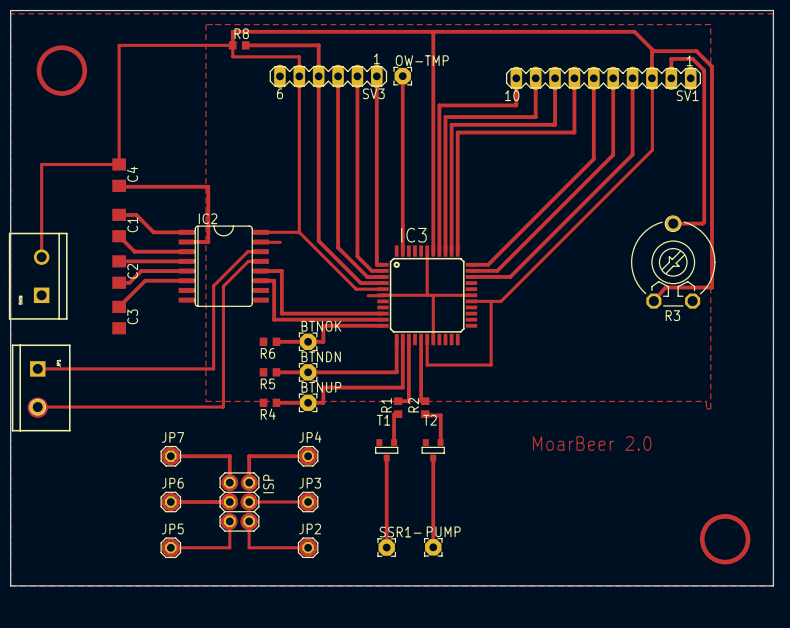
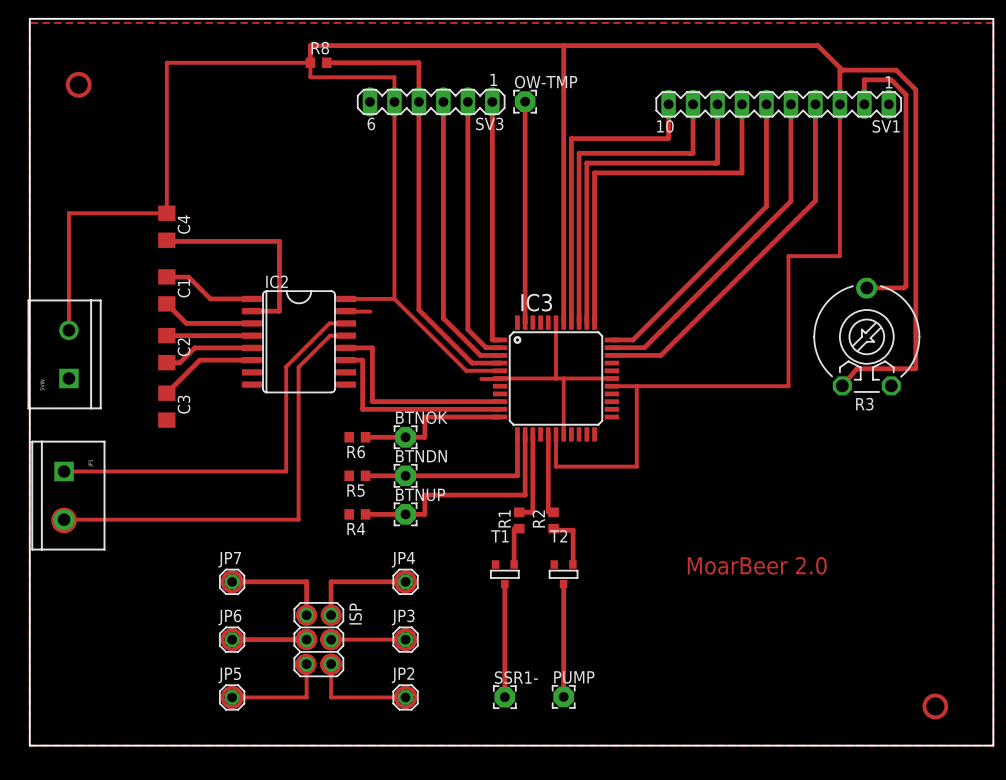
top zone outline: (205, 24) (710, 24) (710, 408) (706, 408) (706, 401) (205, 401) (205, 24) -> none
drawing: [36, 45, 88, 96] -> none
drawing: none -> [65, 71, 92, 98]
top track: (651, 78) (652, 150) (501, 301) -> (839, 104) (839, 256) (788, 256) (788, 386) (649, 386)
drawing: [699, 514, 751, 565] -> none
drawing: none -> [922, 693, 949, 720]

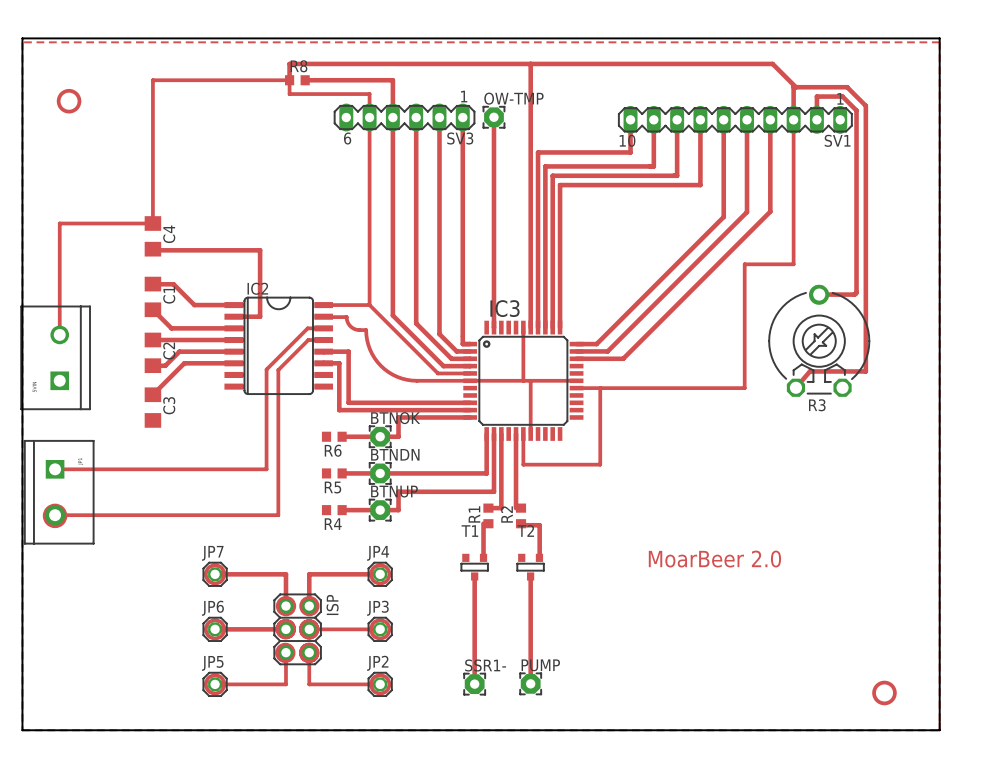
top track: (500, 378) (481, 378) -> (470, 380) (411, 380) (392, 374) (374, 358) (368, 344) (366, 330) (353, 328) (348, 323) (346, 317)

